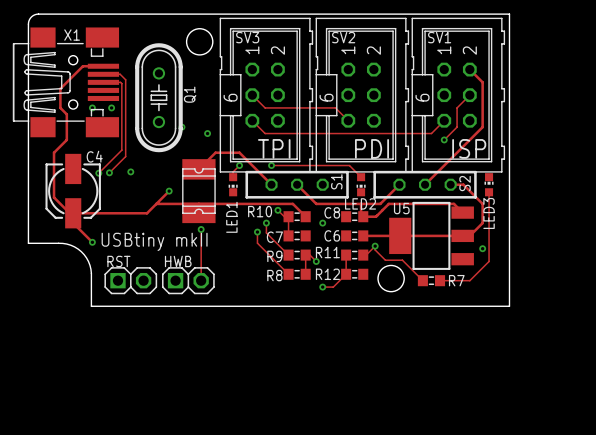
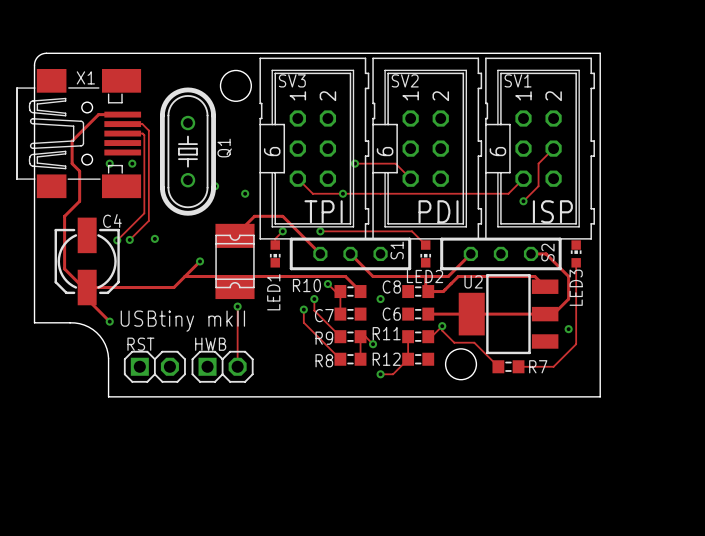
track: (469, 69) (482, 82) (482, 127) (425, 184) -> none
track: (252, 95) (265, 107) (300, 107) -> none
via: none -> (354, 163)
via: none -> (342, 193)
U5 name: U5 (401, 208) -> U2 (473, 281)

